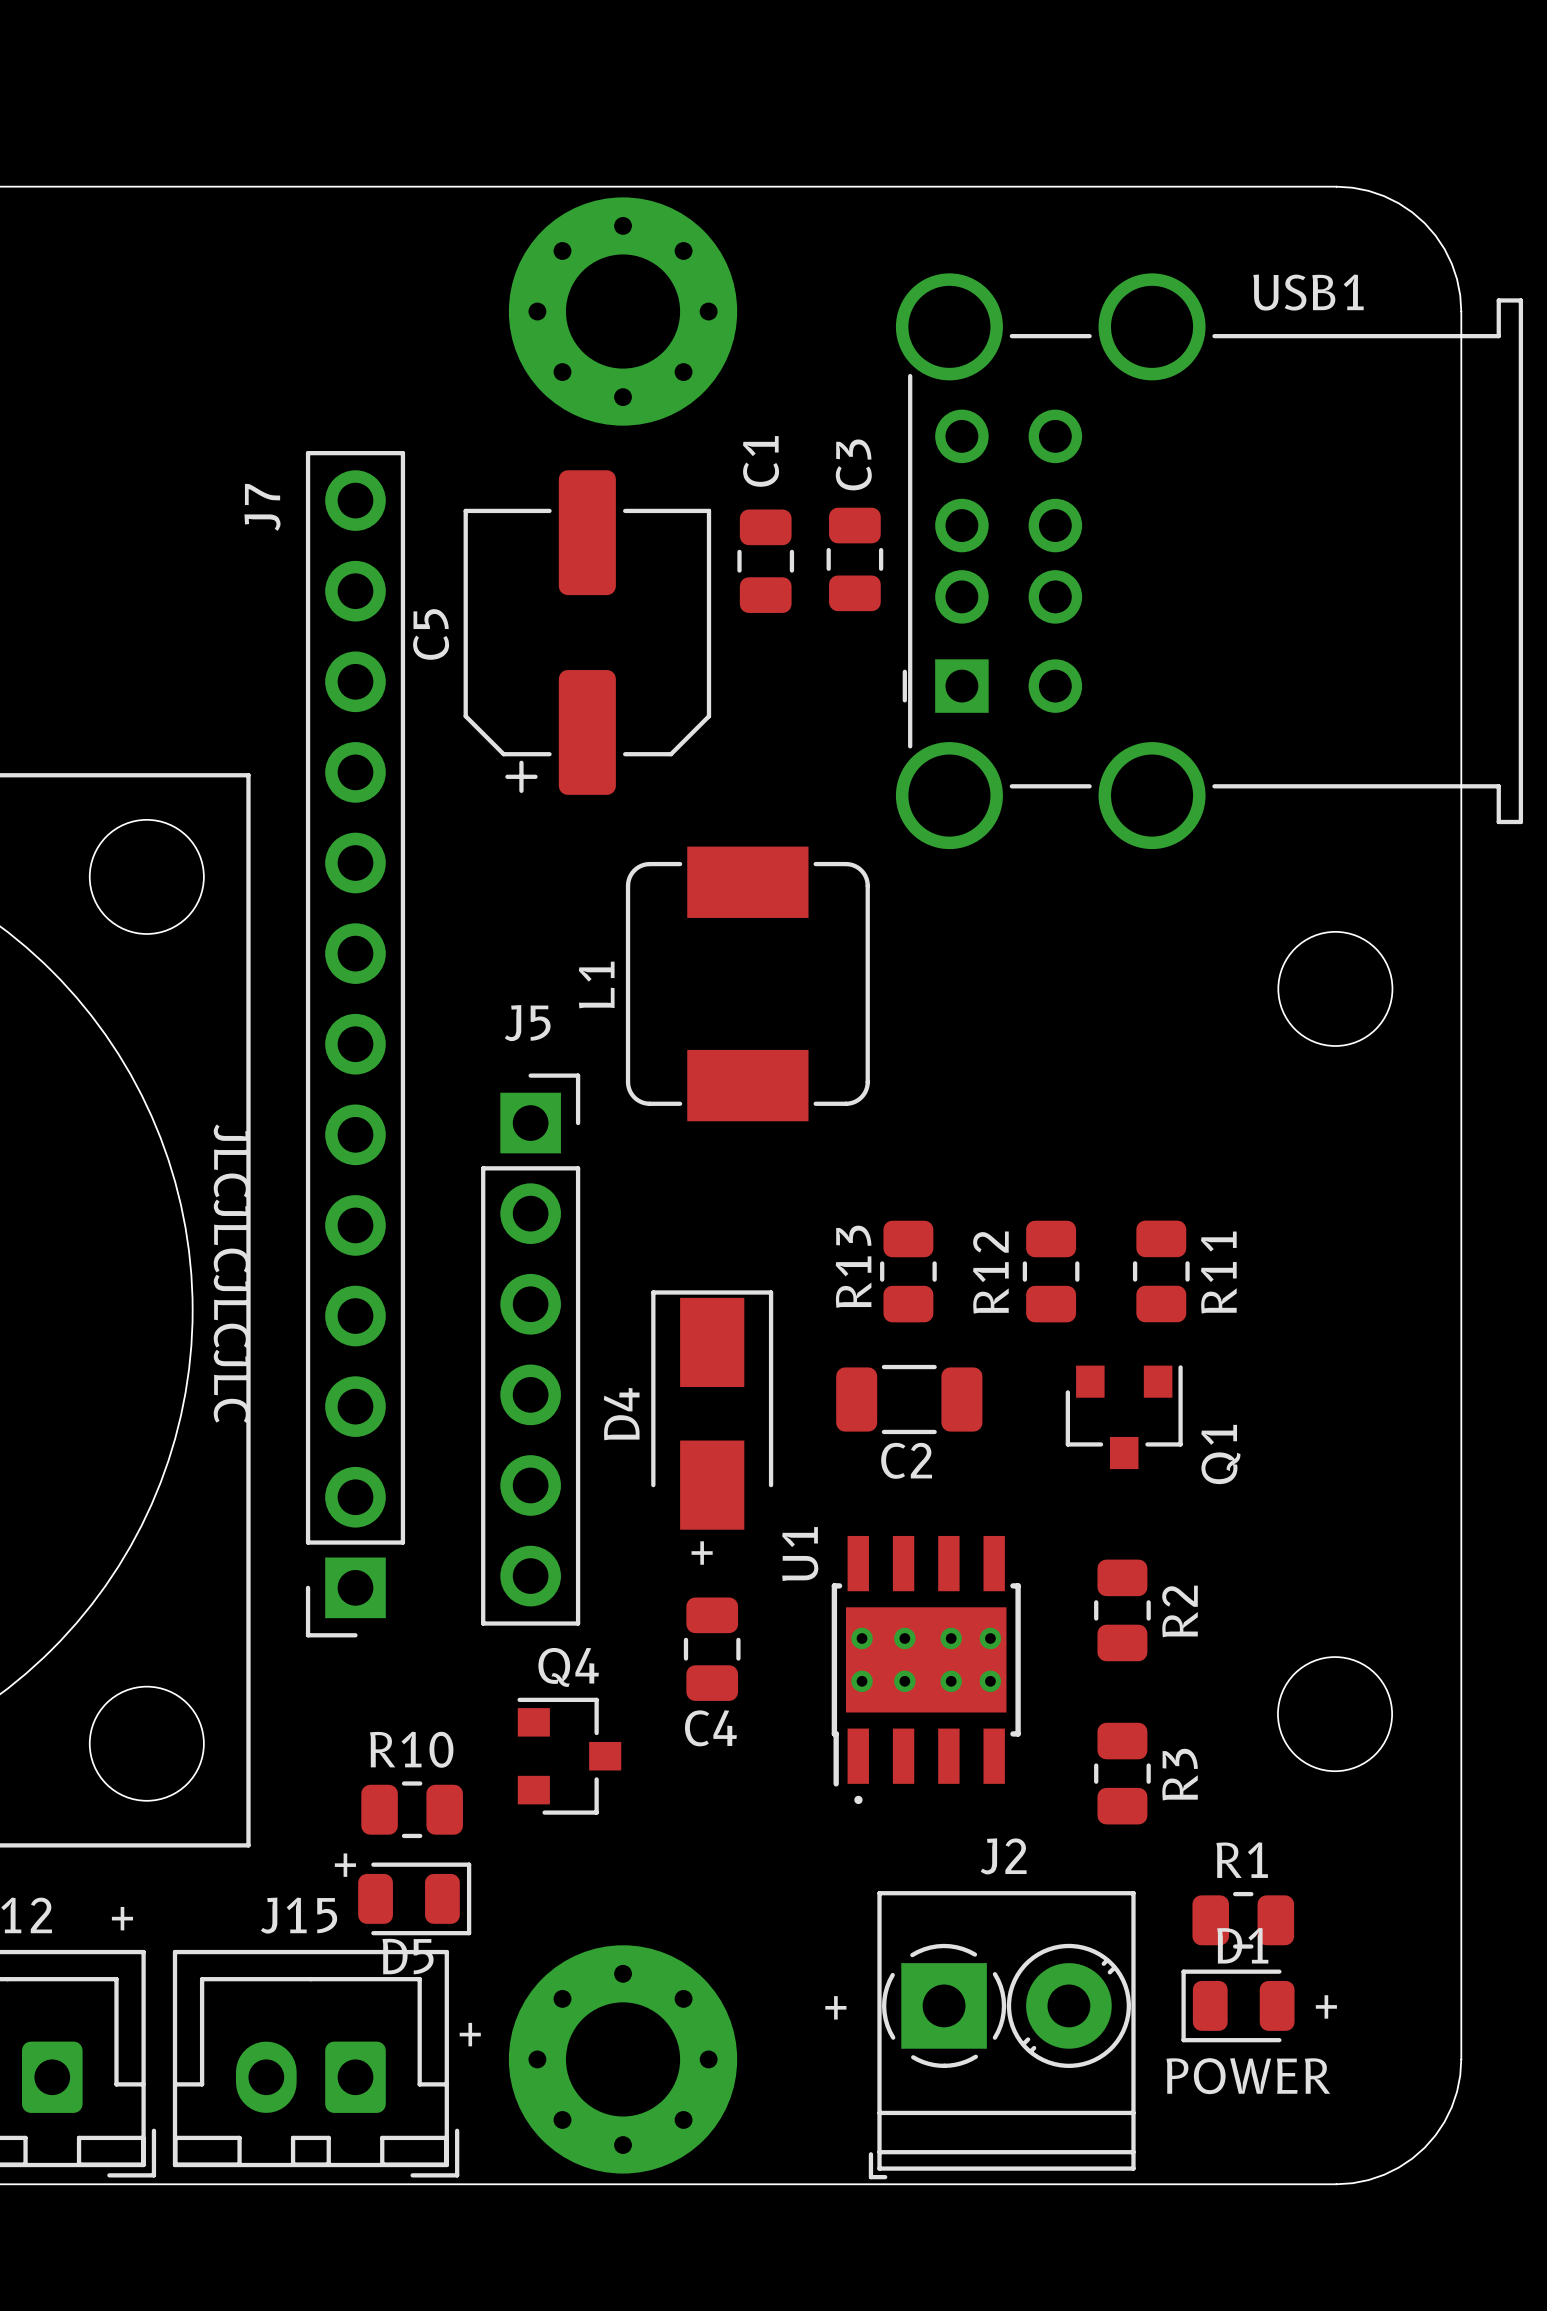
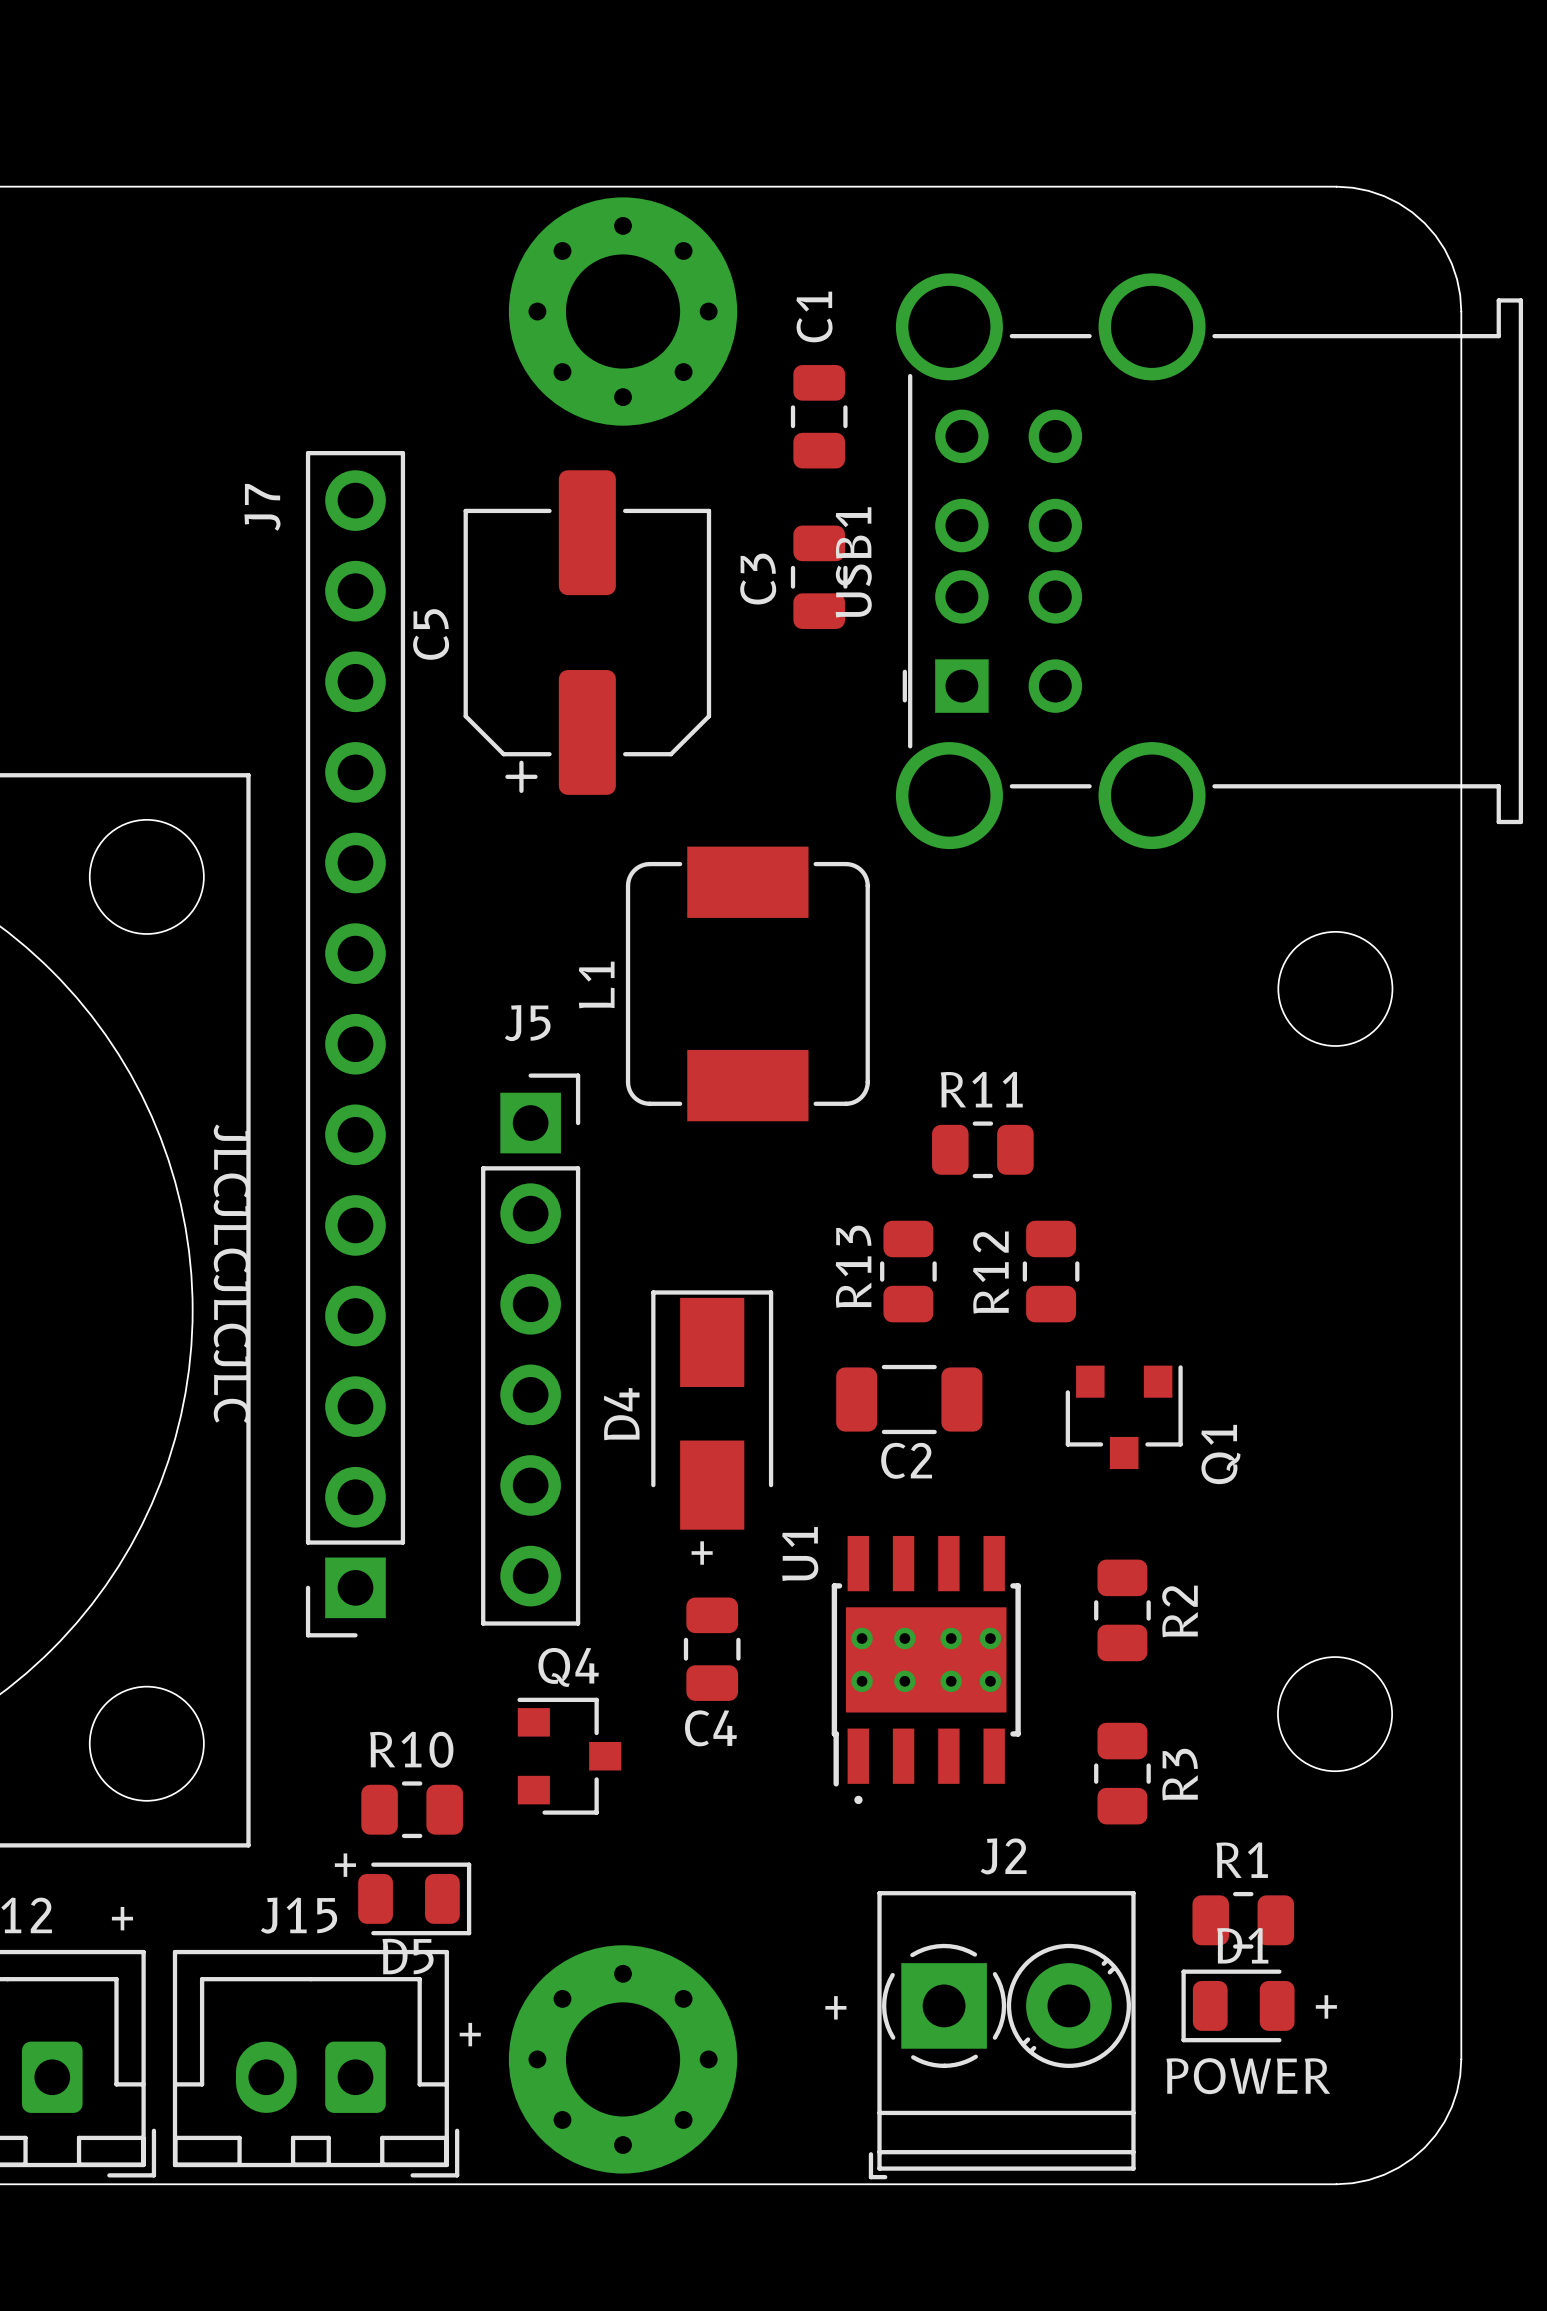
USB1 name rotation: 0° (1308, 292) -> 90° counterclockwise (853, 562)
USB1 name position: USB1 (1308, 292) -> USB1 (853, 562)
C3 name position: C3 (853, 464) -> C3 (758, 579)
C3 position: (854, 559) -> (819, 577)
C1 position: (765, 561) -> (819, 416)
R11 rotation: 0° (1161, 1271) -> 90° clockwise (982, 1149)
R11 position: (1161, 1271) -> (982, 1149)
R11 name position: R11 (1218, 1272) -> R11 (981, 1089)

